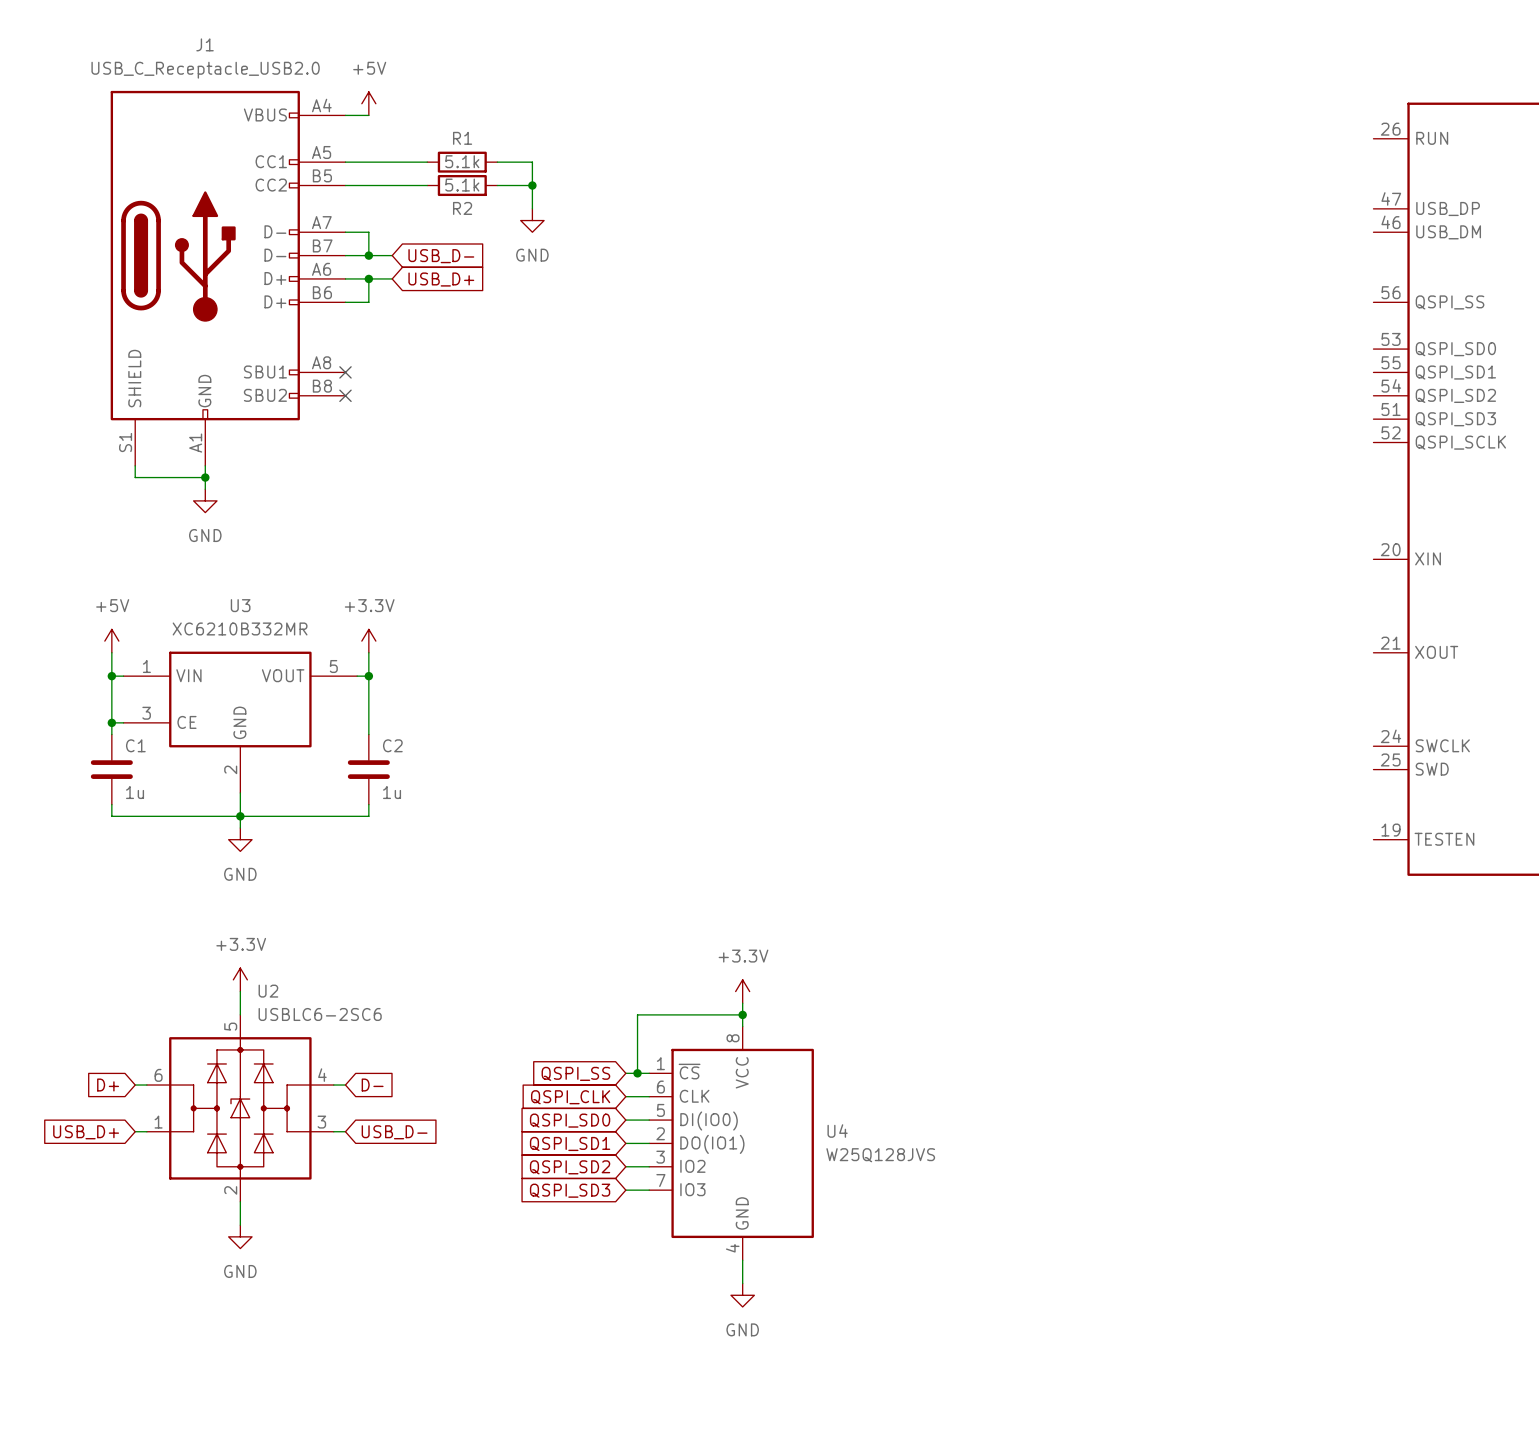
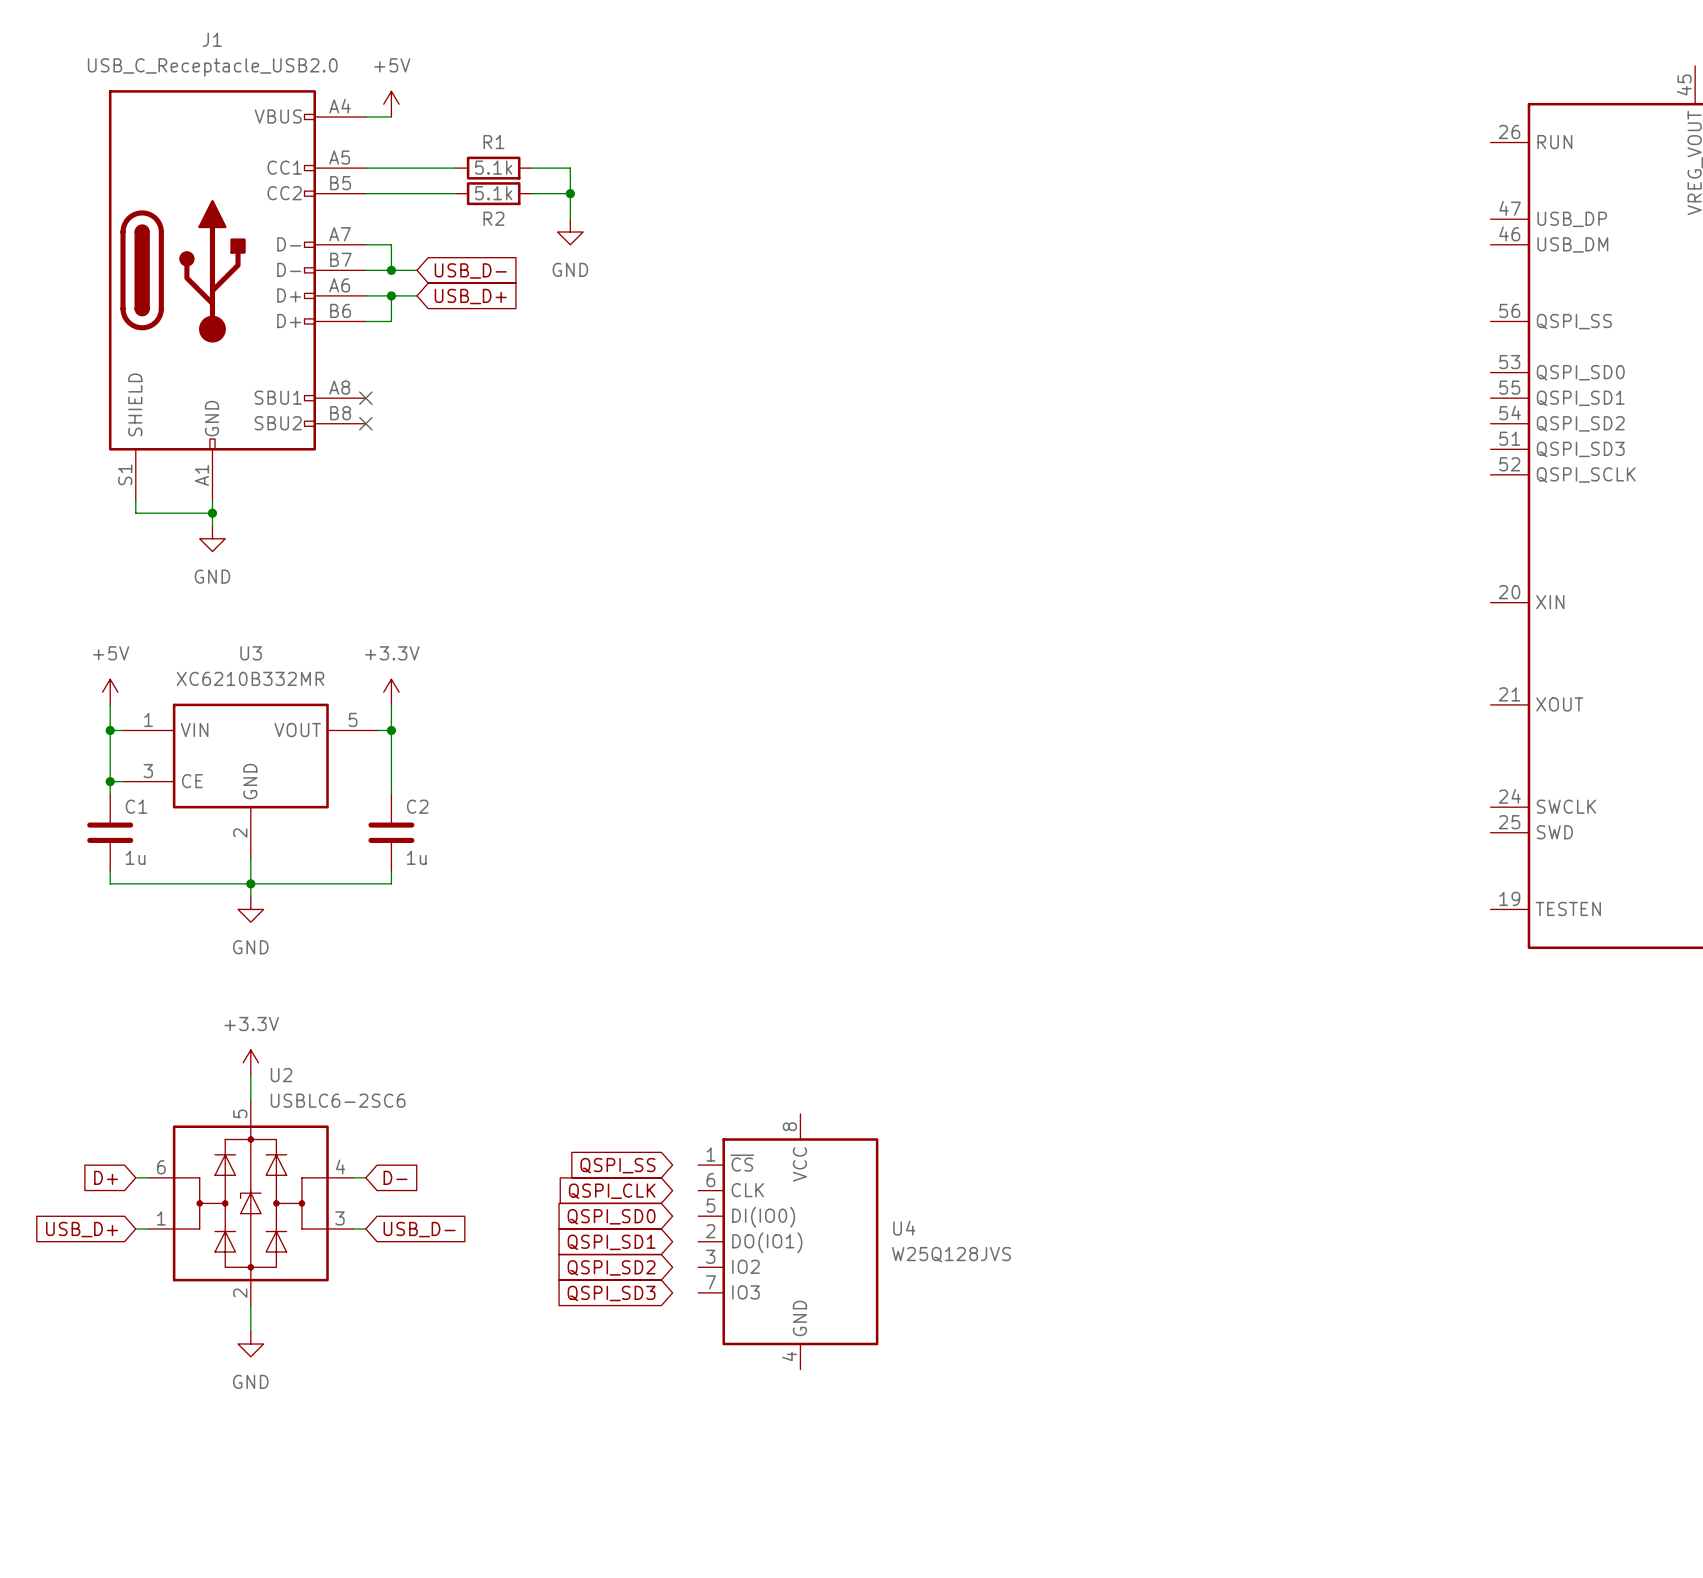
power symbol: +3.3V (742, 991) -> none
wire: (742, 1003) (742, 1026) -> none
wire: (742, 1014) (637, 1014) (637, 1073) -> none
junction: (742, 1014) -> none
wire: (625, 1073) (649, 1073) -> none
junction: (637, 1073) -> none
wire: (625, 1096) (649, 1096) -> none
wire: (625, 1120) (649, 1120) -> none
wire: (625, 1143) (649, 1143) -> none
wire: (625, 1166) (649, 1166) -> none
wire: (625, 1190) (649, 1190) -> none
wire: (742, 1260) (742, 1283) -> none
power symbol: GND (742, 1295) -> none

